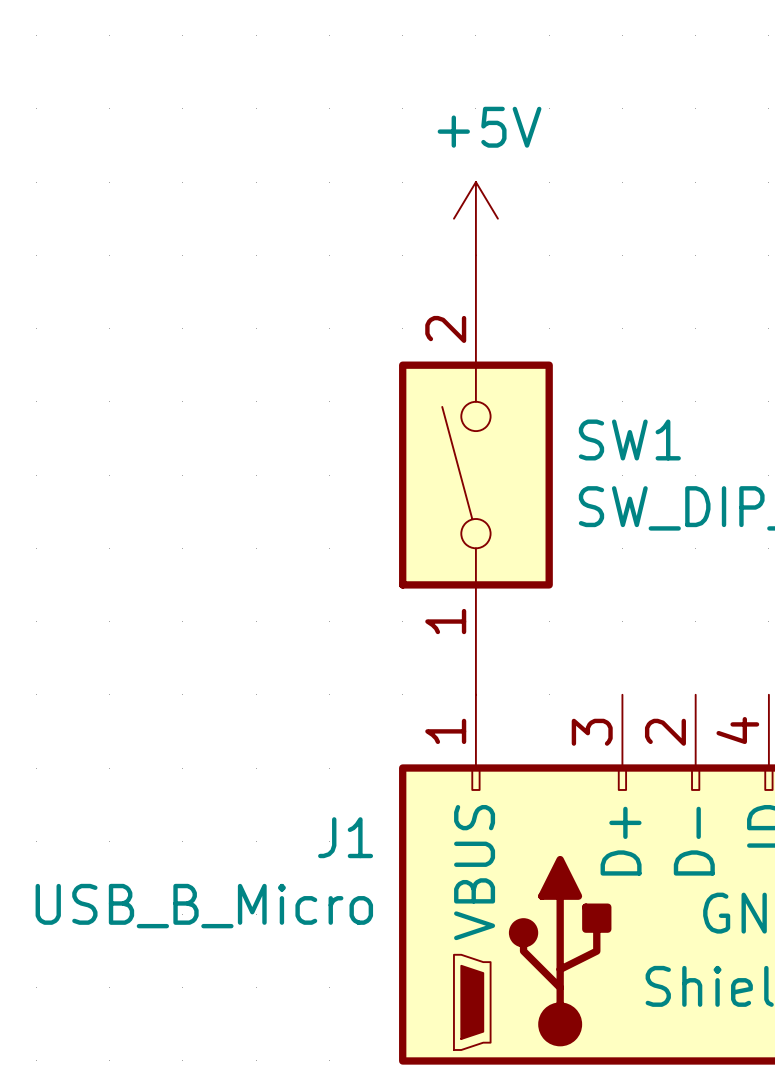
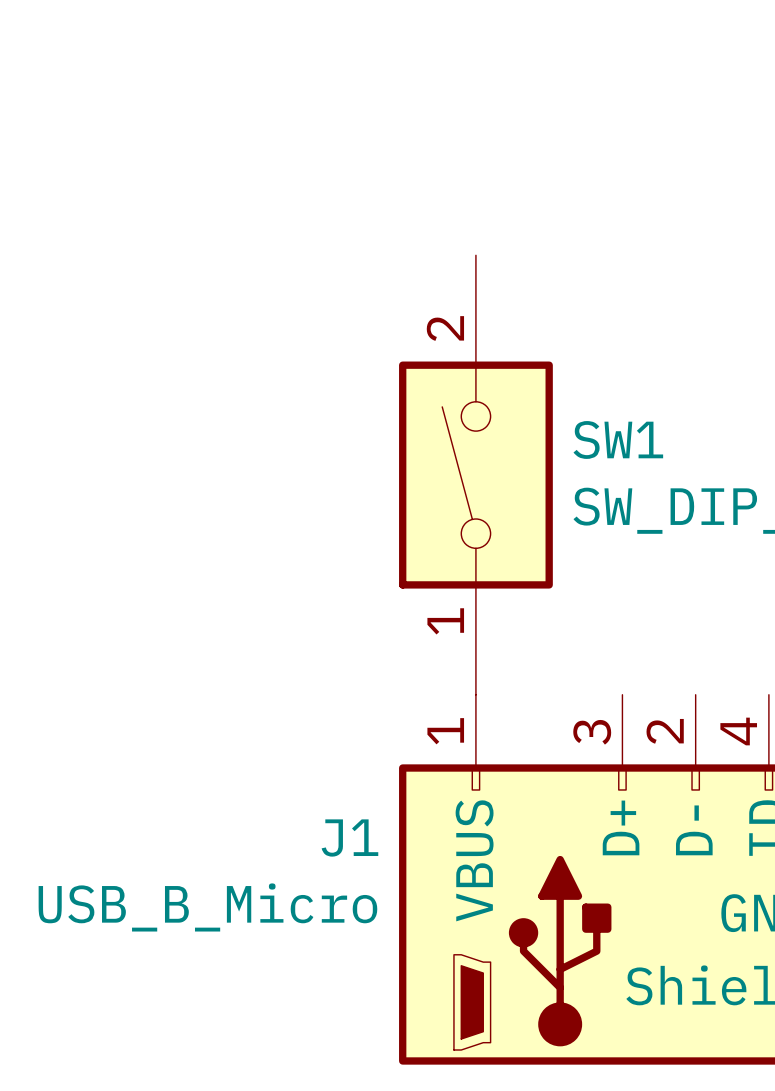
power symbol: +5V (475, 218) -> none

